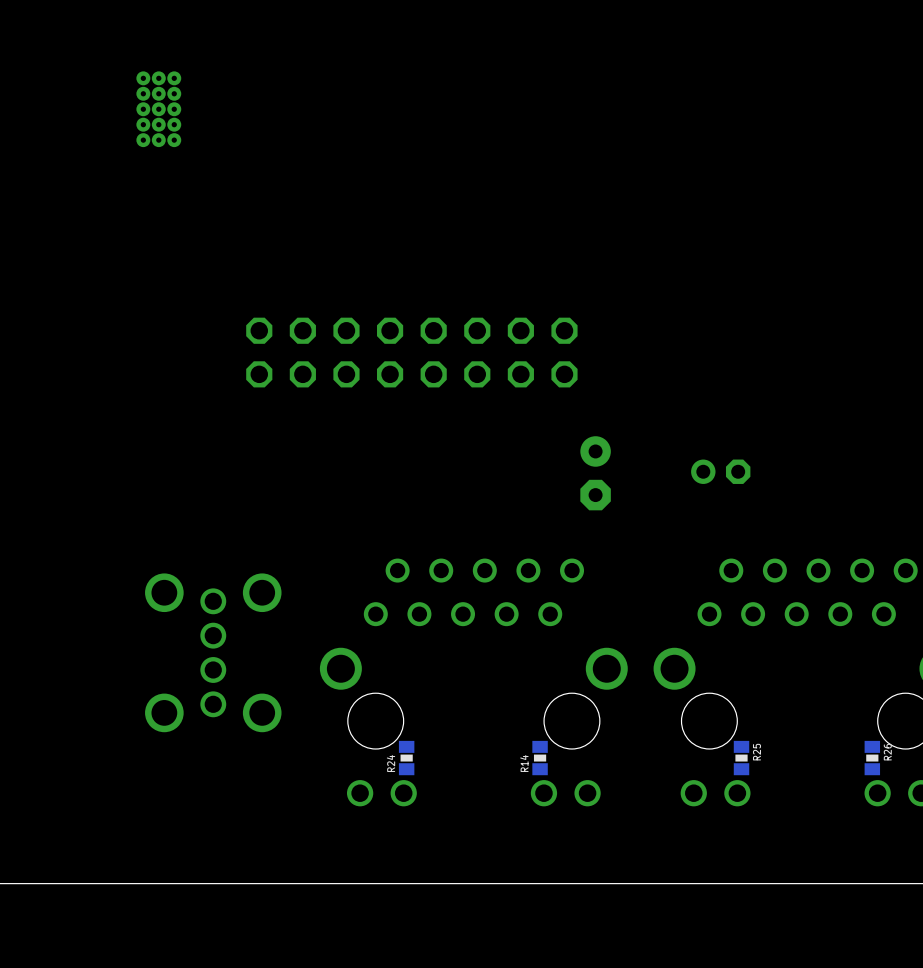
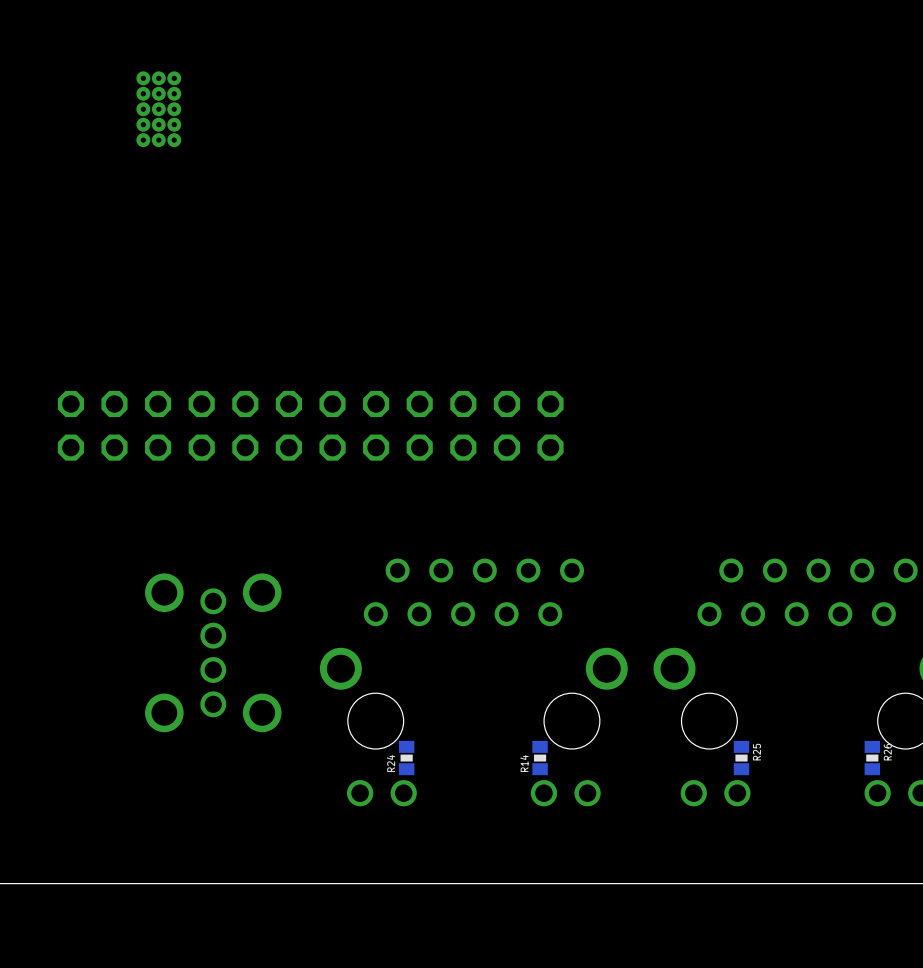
part position: (411, 352) -> (223, 425)
part: none -> (485, 425)
part: (720, 471) -> none
part: (595, 473) -> none

